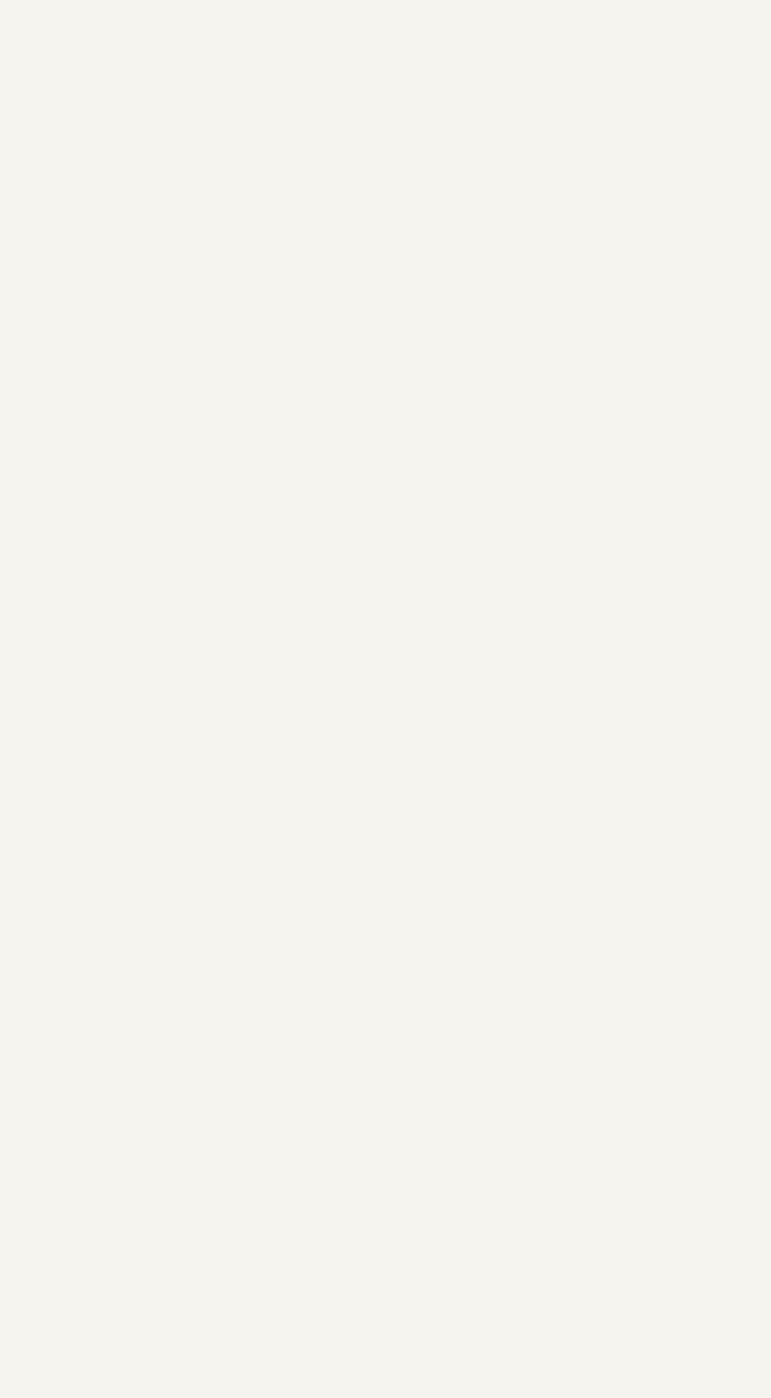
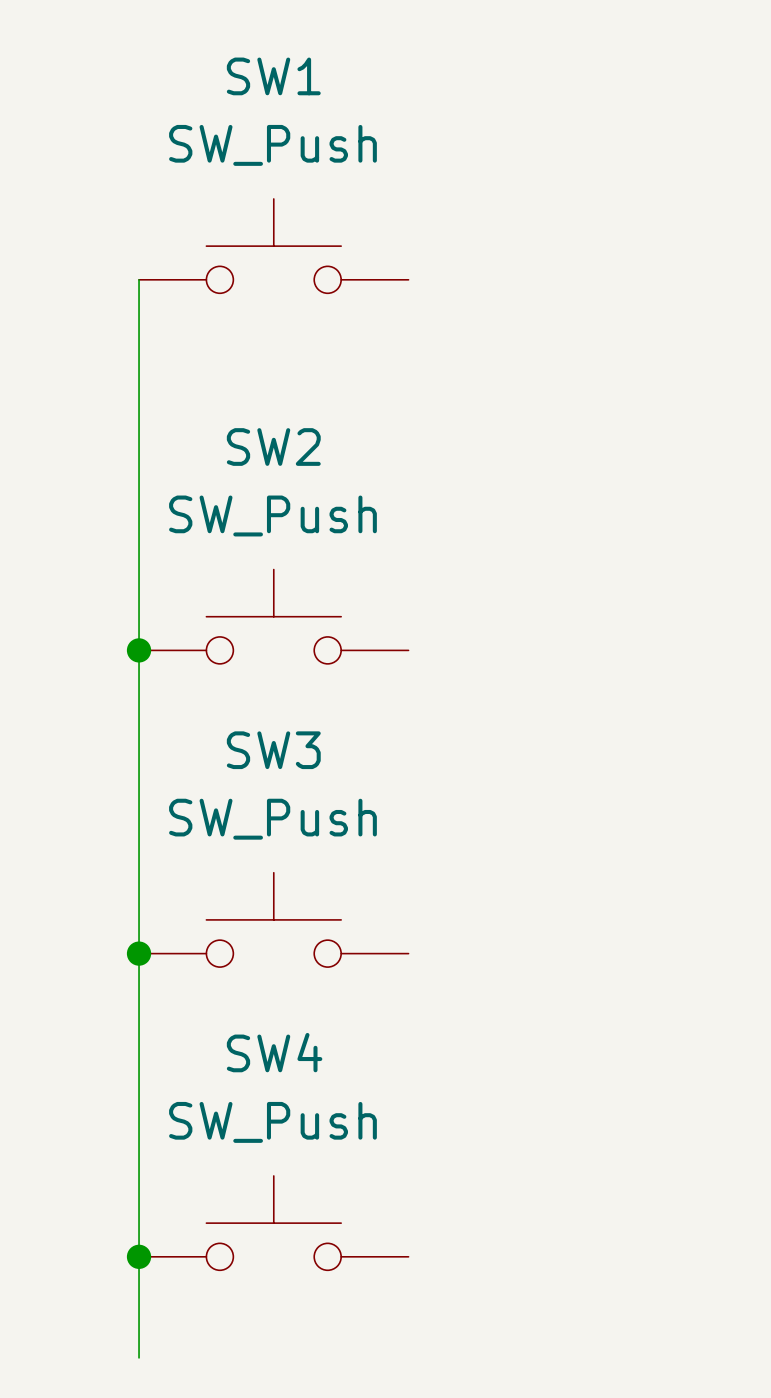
SW1: none -> SW_Push (273, 246)
wire: none -> (139, 279) (139, 1357)
SW2: none -> SW_Push (273, 616)
junction: none -> (139, 650)
SW3: none -> SW_Push (273, 919)
junction: none -> (139, 953)
SW4: none -> SW_Push (273, 1223)
junction: none -> (139, 1256)

